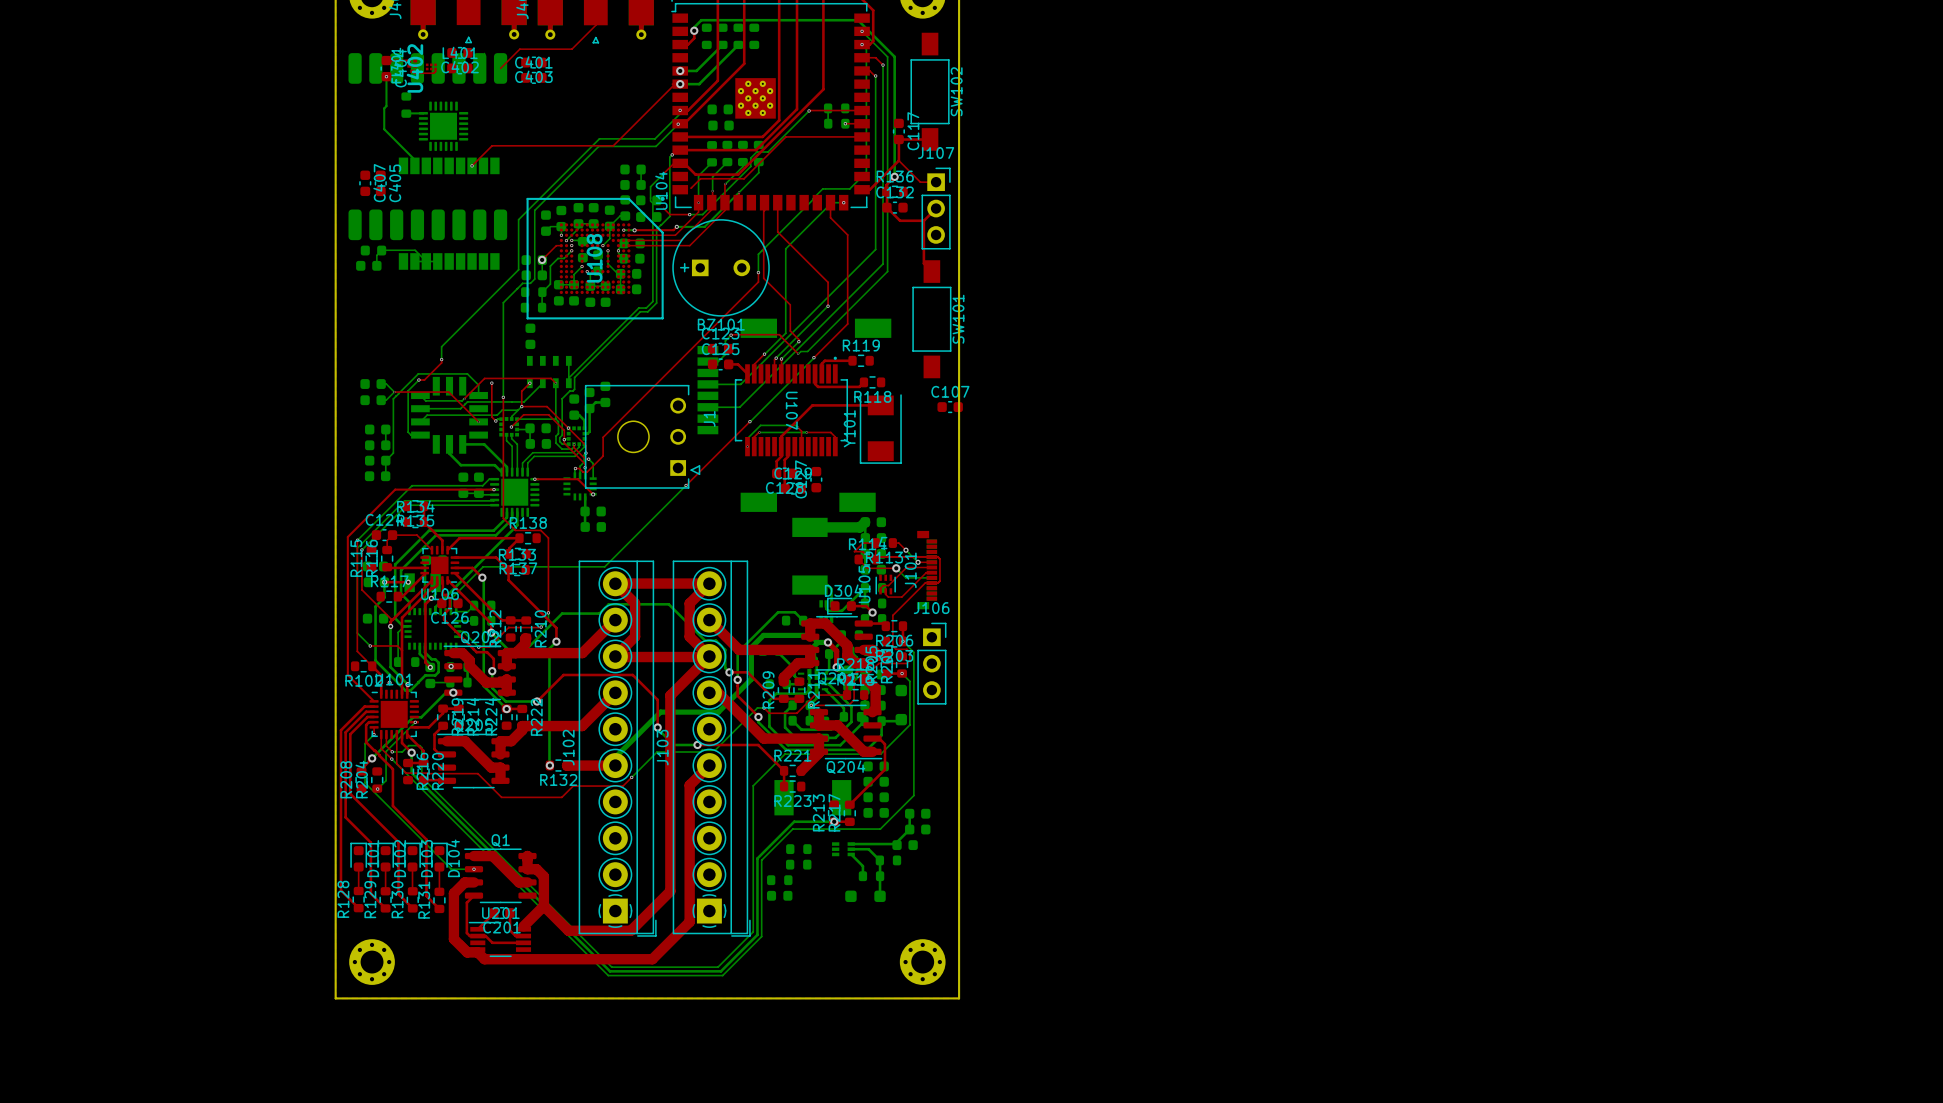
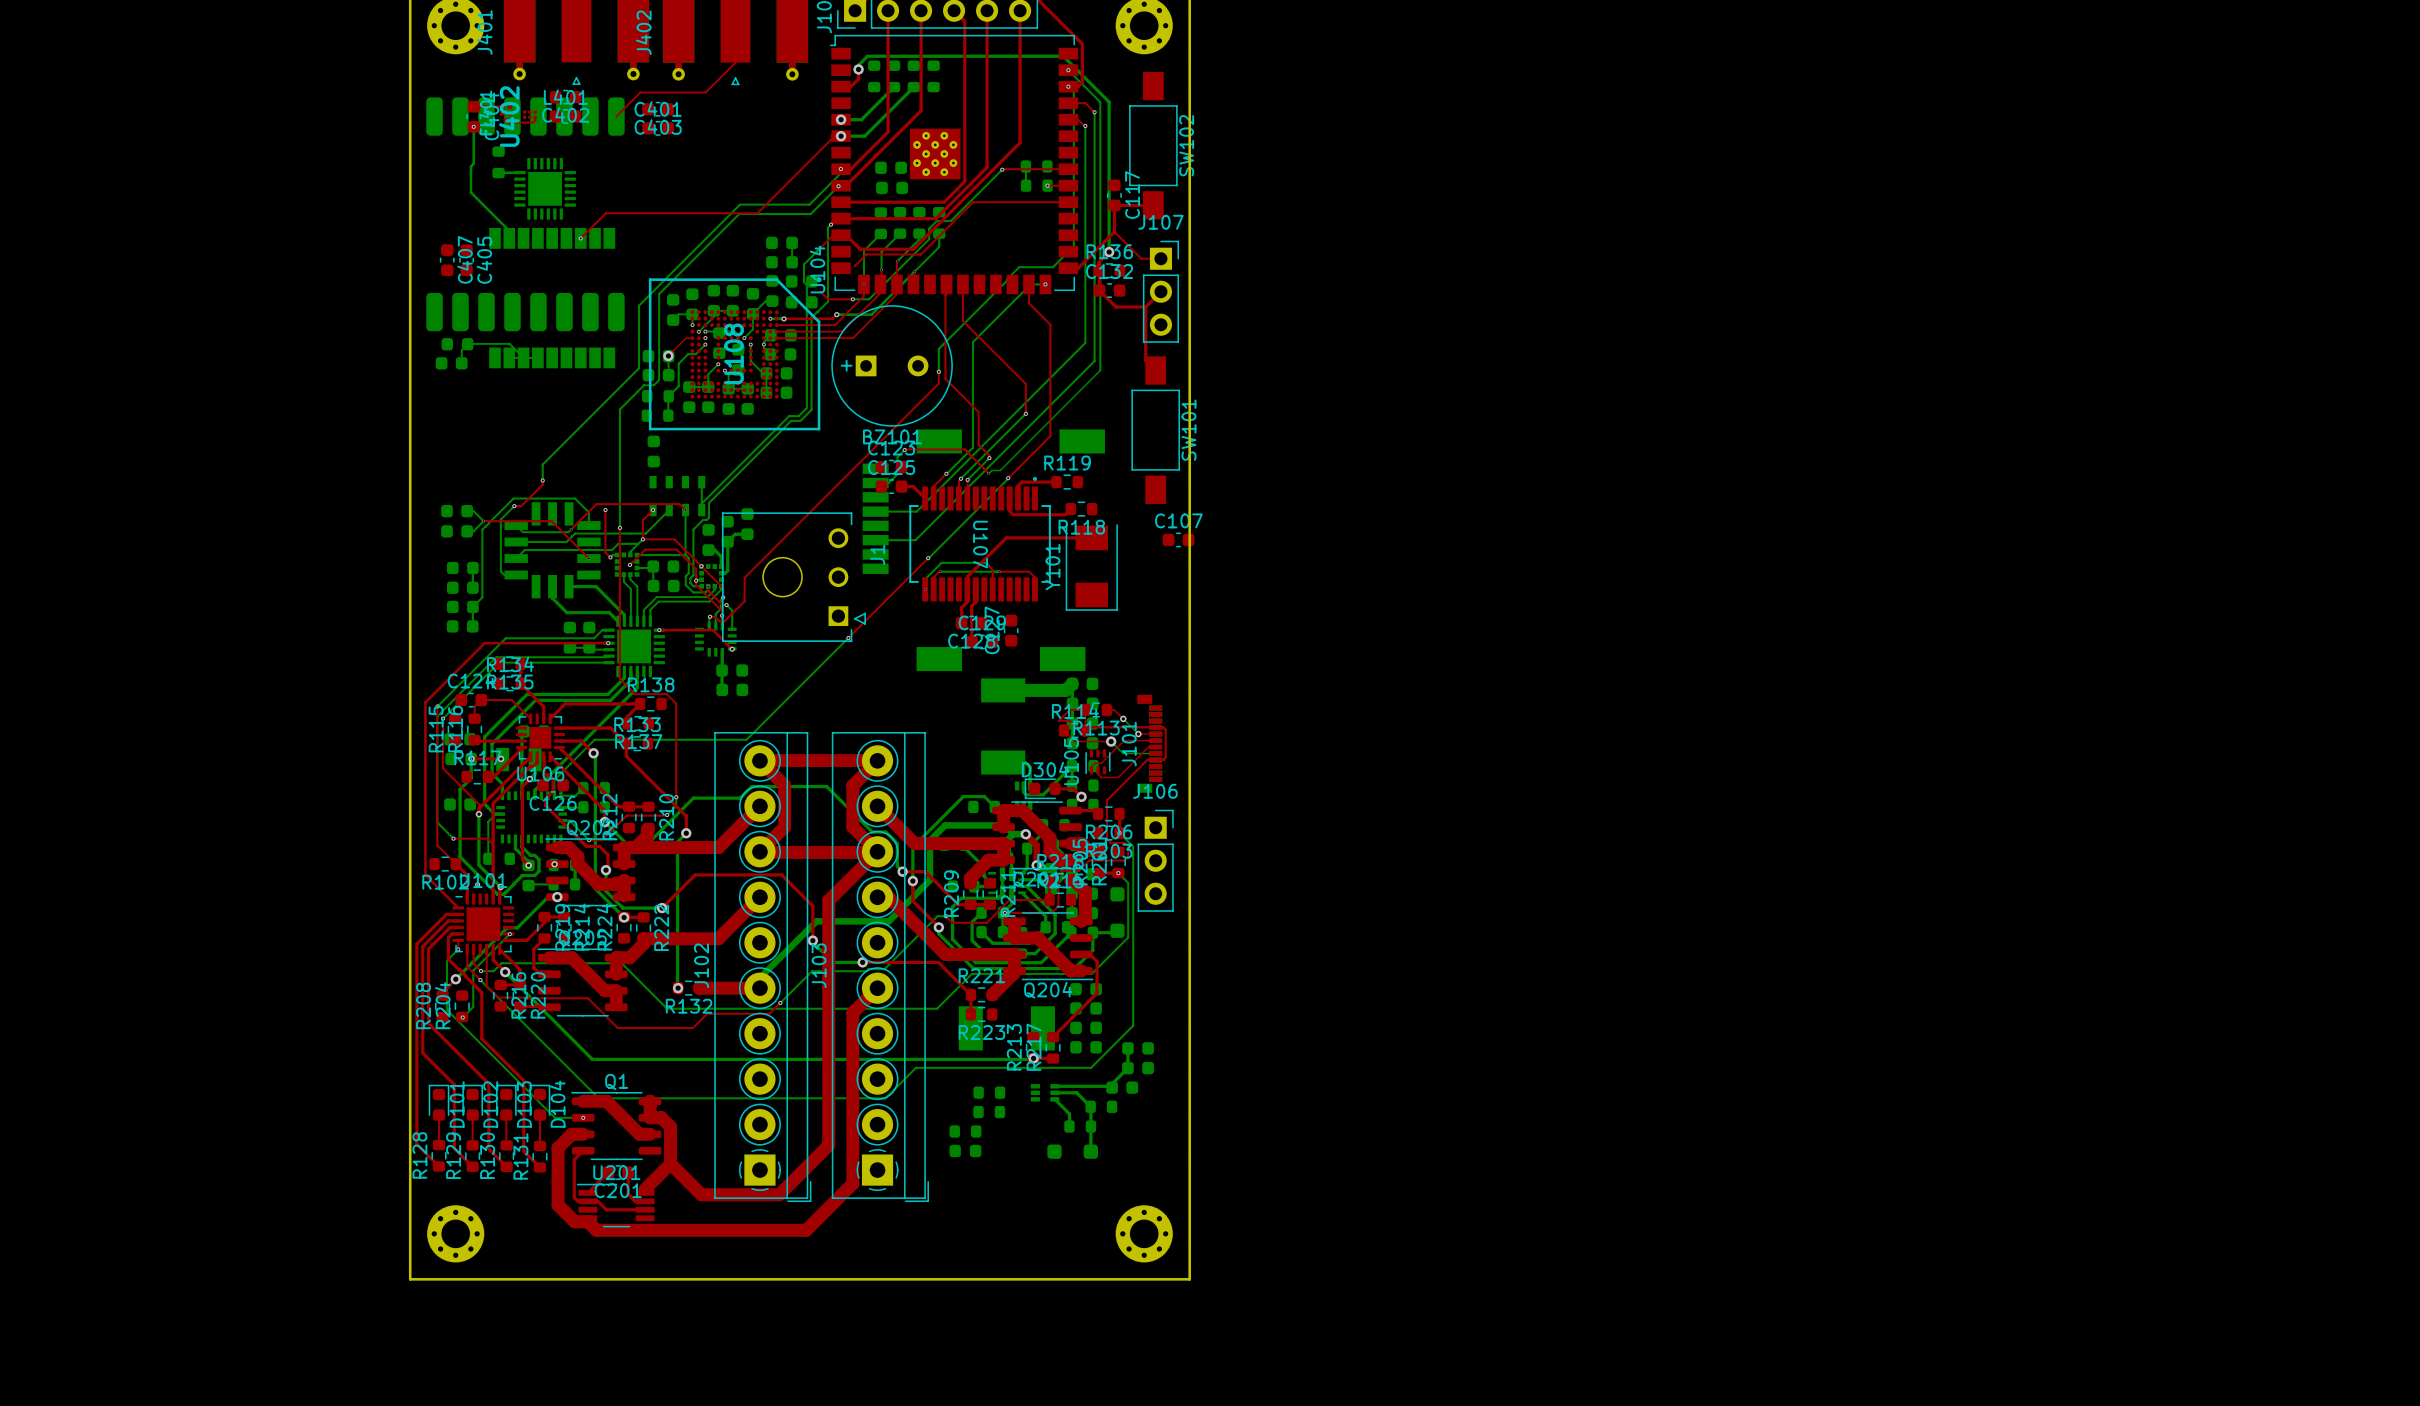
bottom track: (419, 745) (421, 747) (421, 777) (611, 967) (718, 967) (753, 931) (753, 785) (757, 781) -> (515, 963) (621, 963) (667, 1008) (937, 1008)
bottom track: (411, 752) (411, 772) (610, 971) (720, 971) (757, 934) (757, 858) (794, 821) (834, 821) -> (505, 972) (592, 1059) (1032, 1059)
bottom track: (880, 829) (792, 829) (761, 860) (761, 936) (722, 975) (608, 975) (486, 853) -> (1091, 1067) (915, 1067) (885, 1098) (598, 1098)

